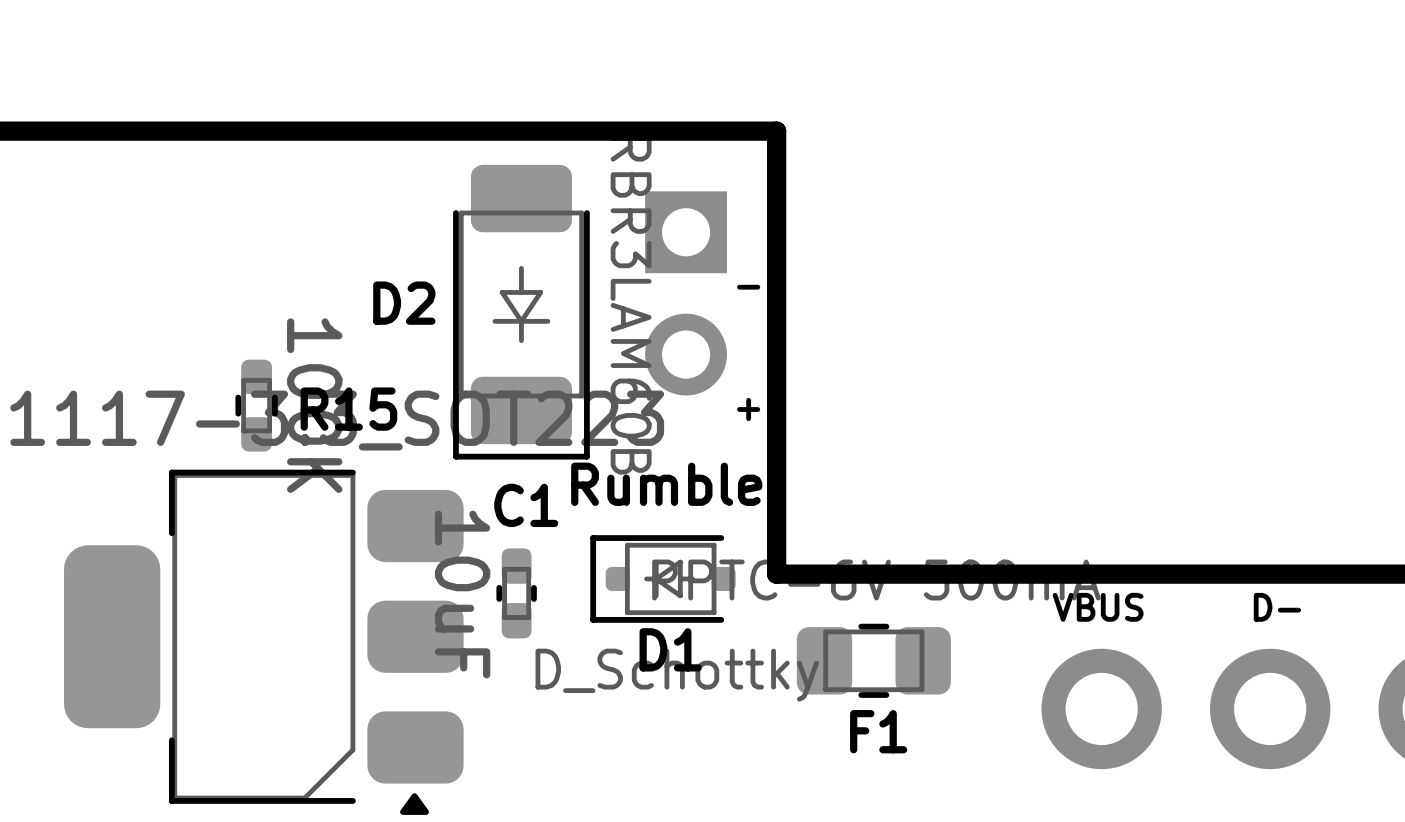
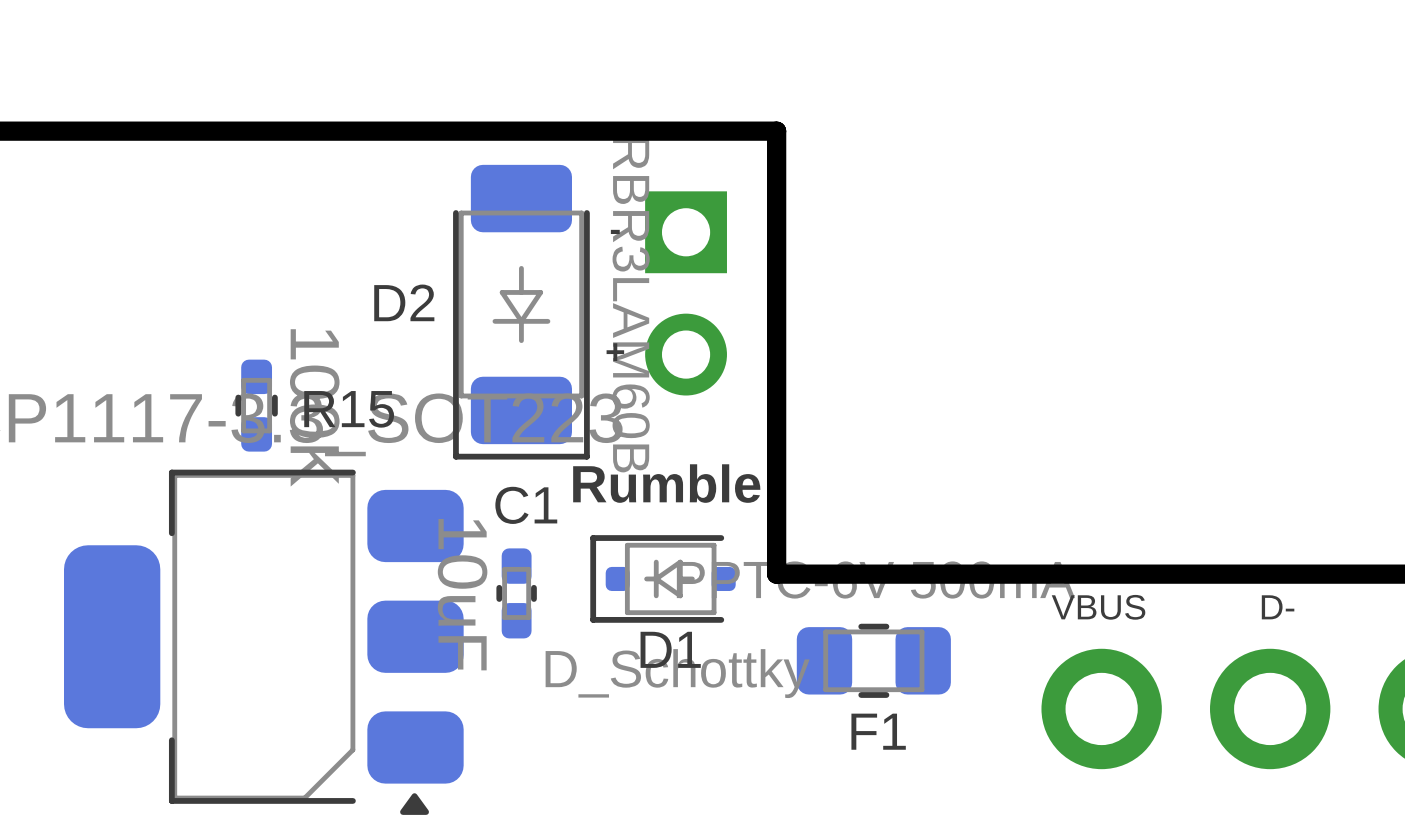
text position: - (748, 287) -> - (615, 231)
text position: + (748, 409) -> + (615, 352)

